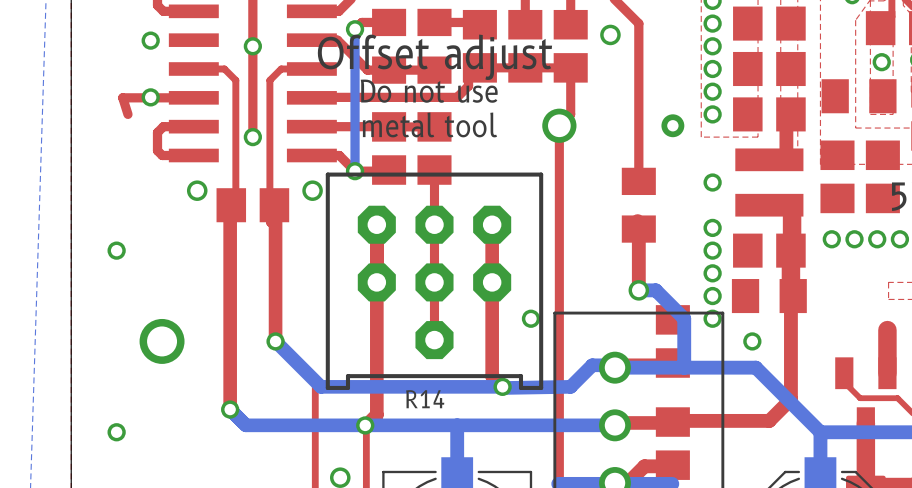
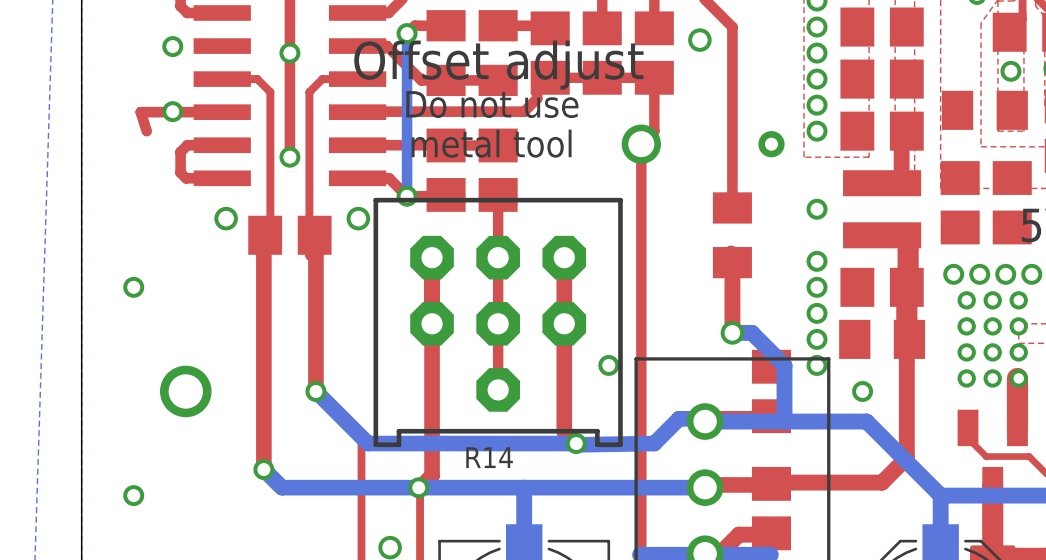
via: none -> (966, 300)
via: none -> (992, 300)
via: none -> (1018, 300)
via: none -> (966, 326)
via: none -> (992, 326)
via: none -> (1018, 326)
via: none -> (966, 352)
via: none -> (992, 352)
via: none -> (1018, 352)
via: none -> (966, 378)
via: none -> (992, 378)
via: none -> (1018, 378)

